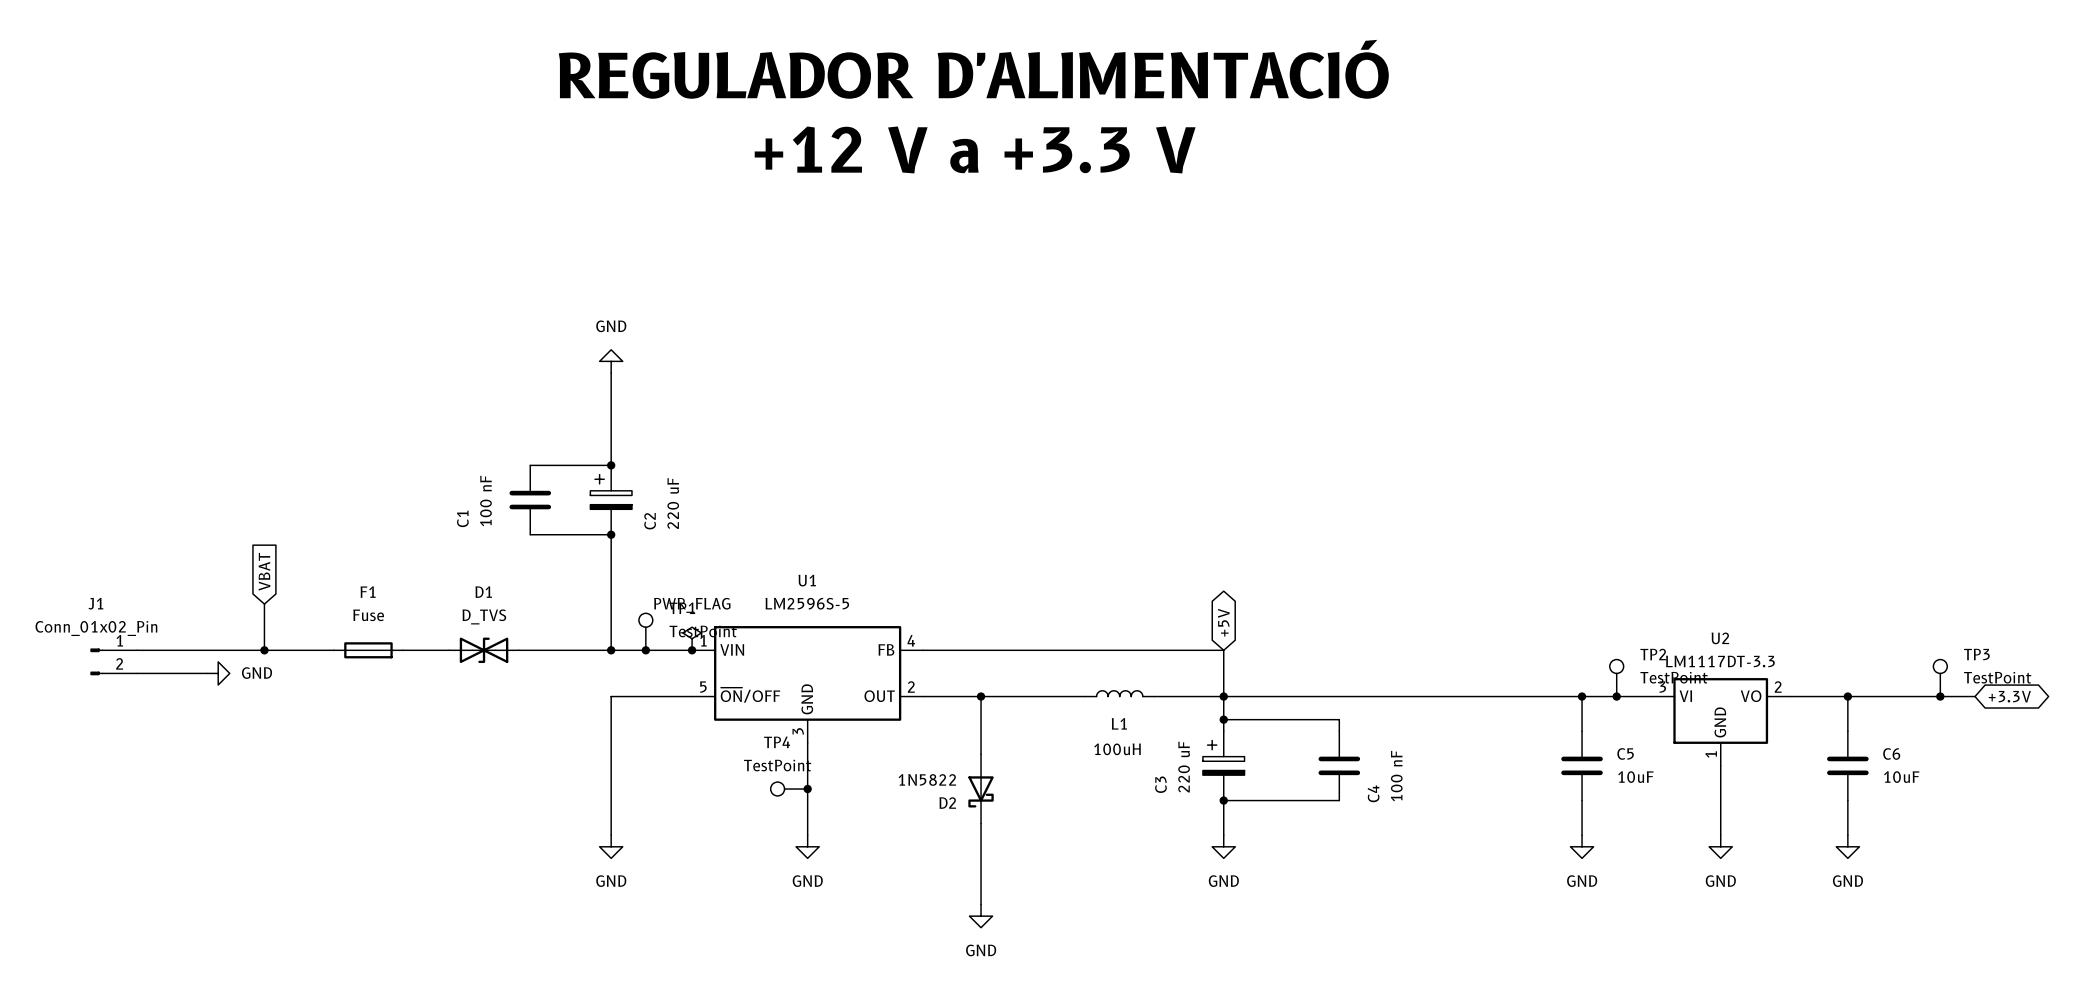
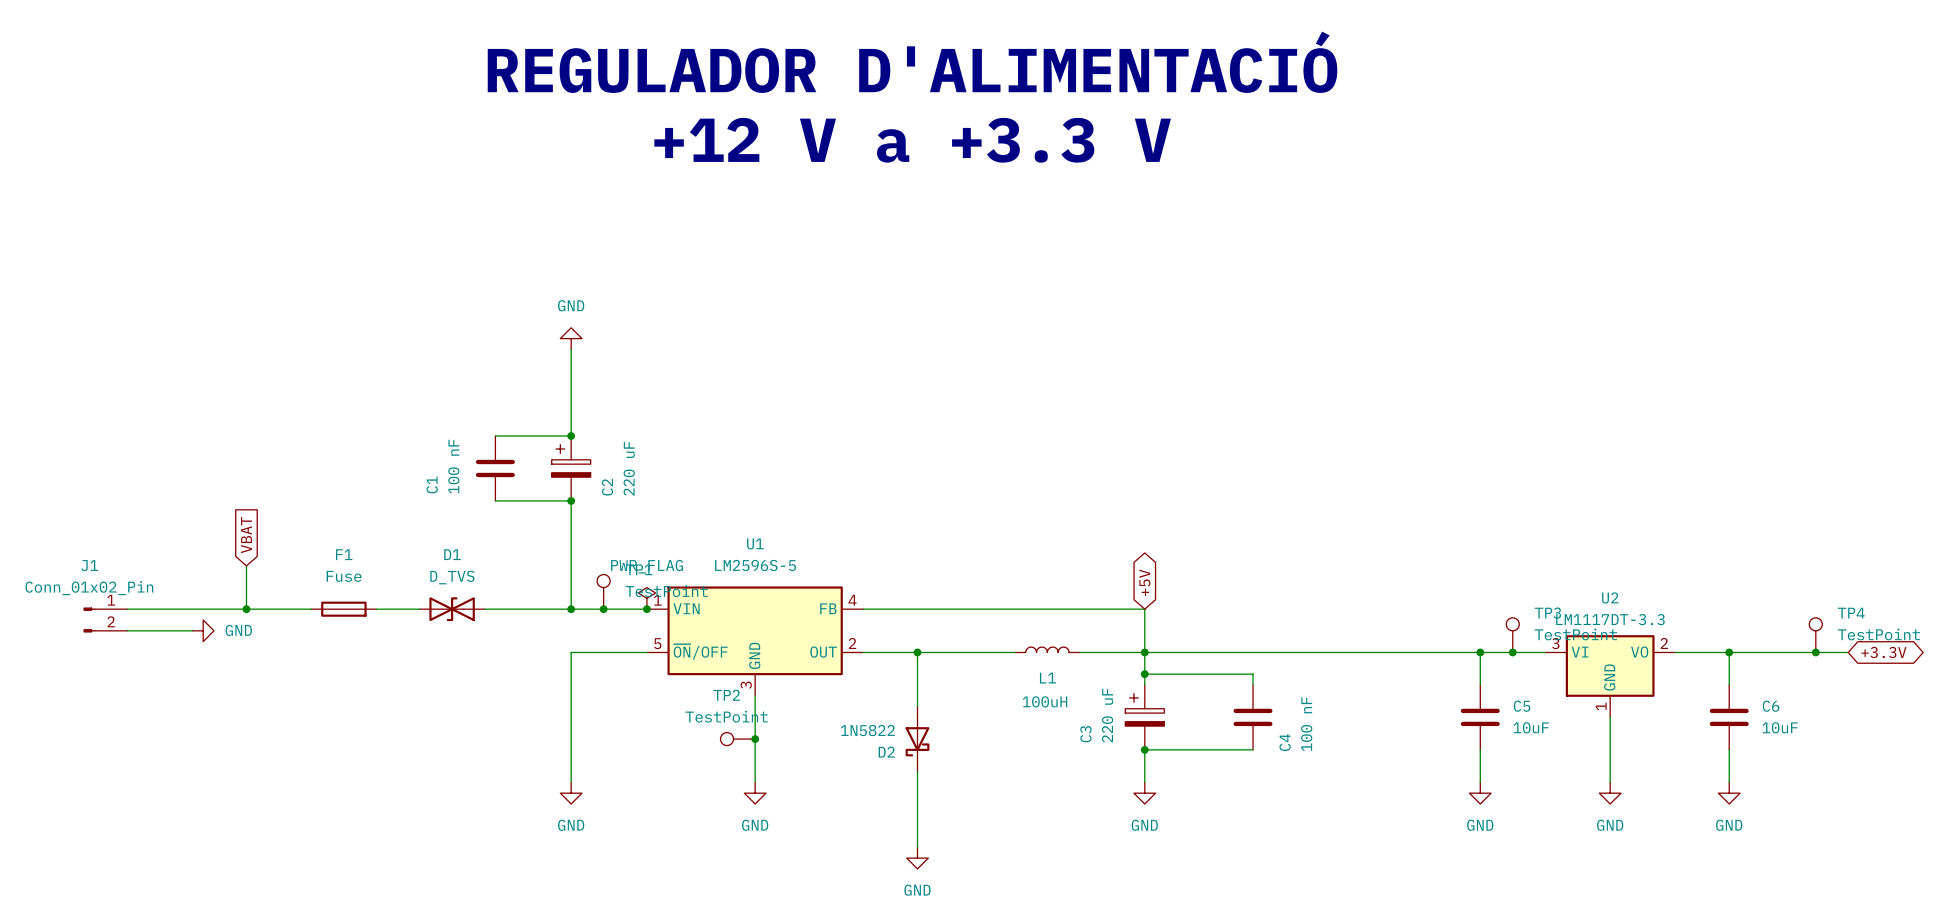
TP2 name: TP2 (1653, 654) -> TP3 (1547, 613)
TP3 name: TP3 (1976, 654) -> TP4 (1851, 613)
TP4 name: TP4 (777, 742) -> TP2 (726, 695)

